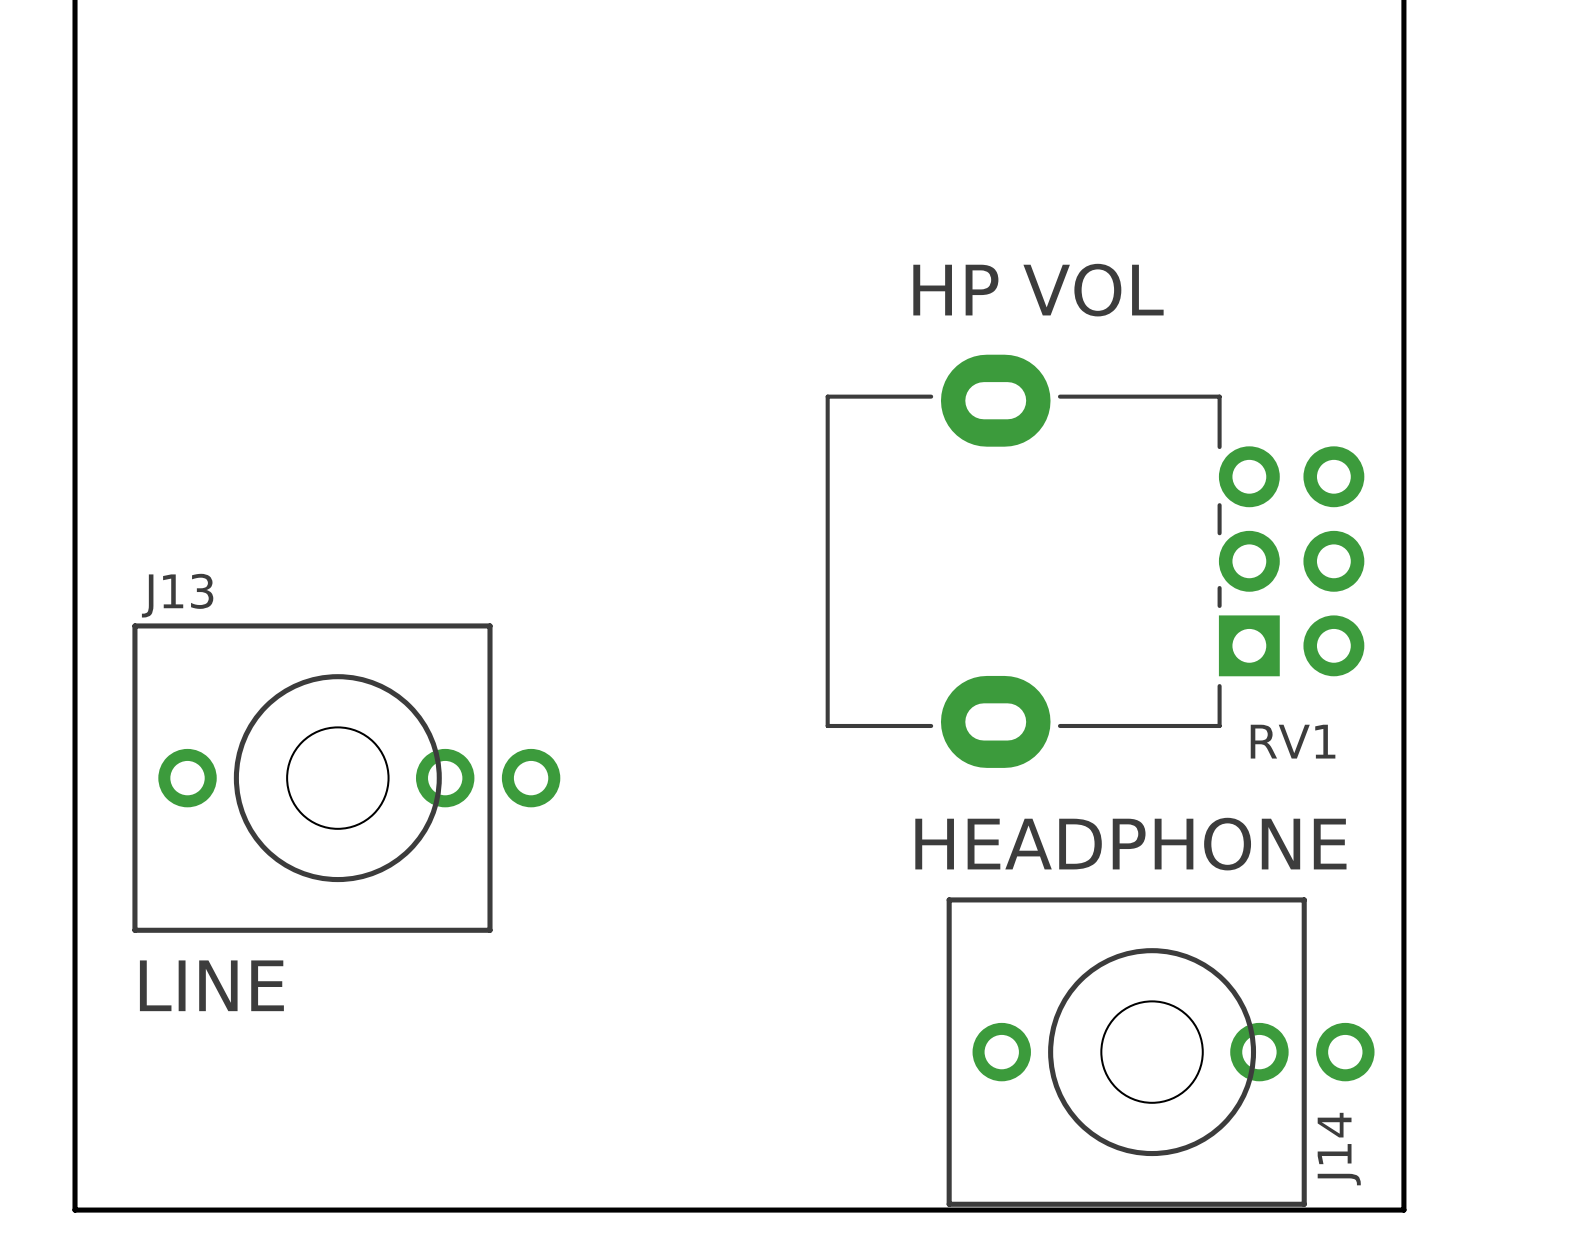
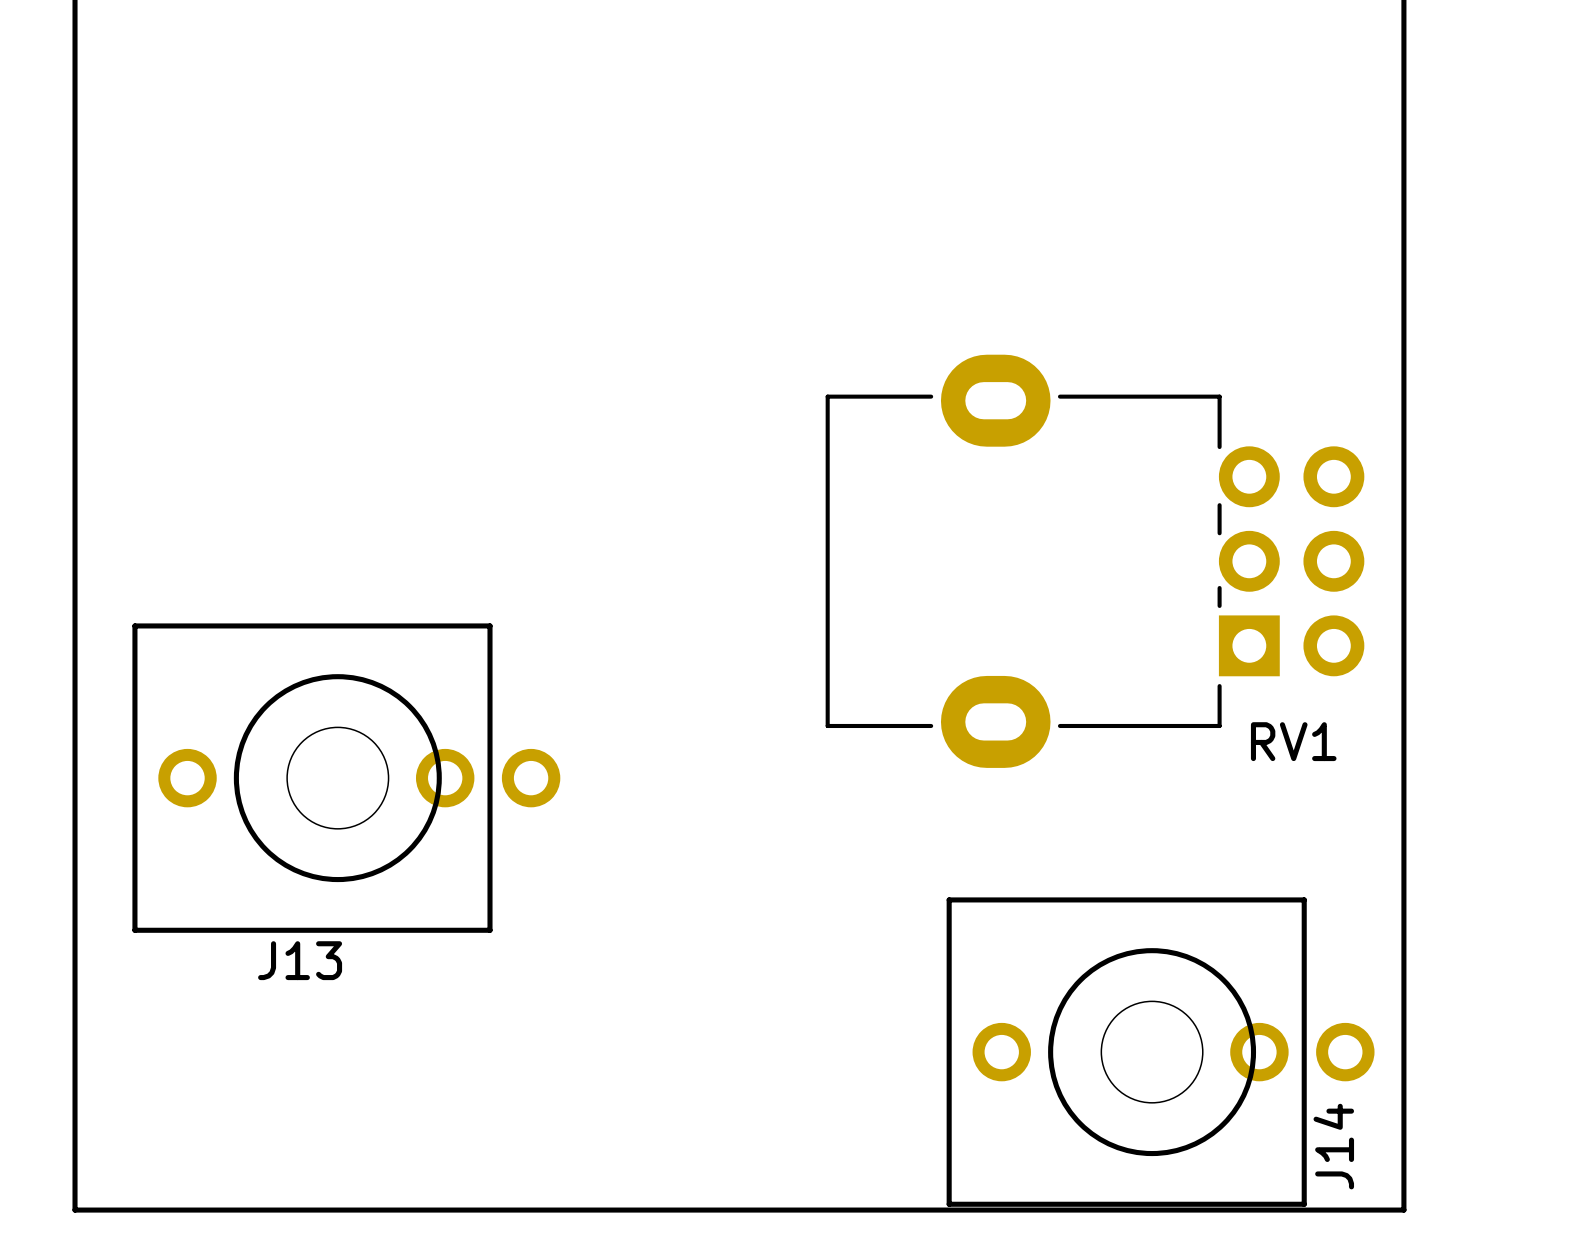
text: HP VOL (1038, 290) -> none
J13 name position: J13 (177, 595) -> J13 (300, 960)
text: HEADPHONE (1130, 844) -> none
text: LINE (211, 985) -> none

